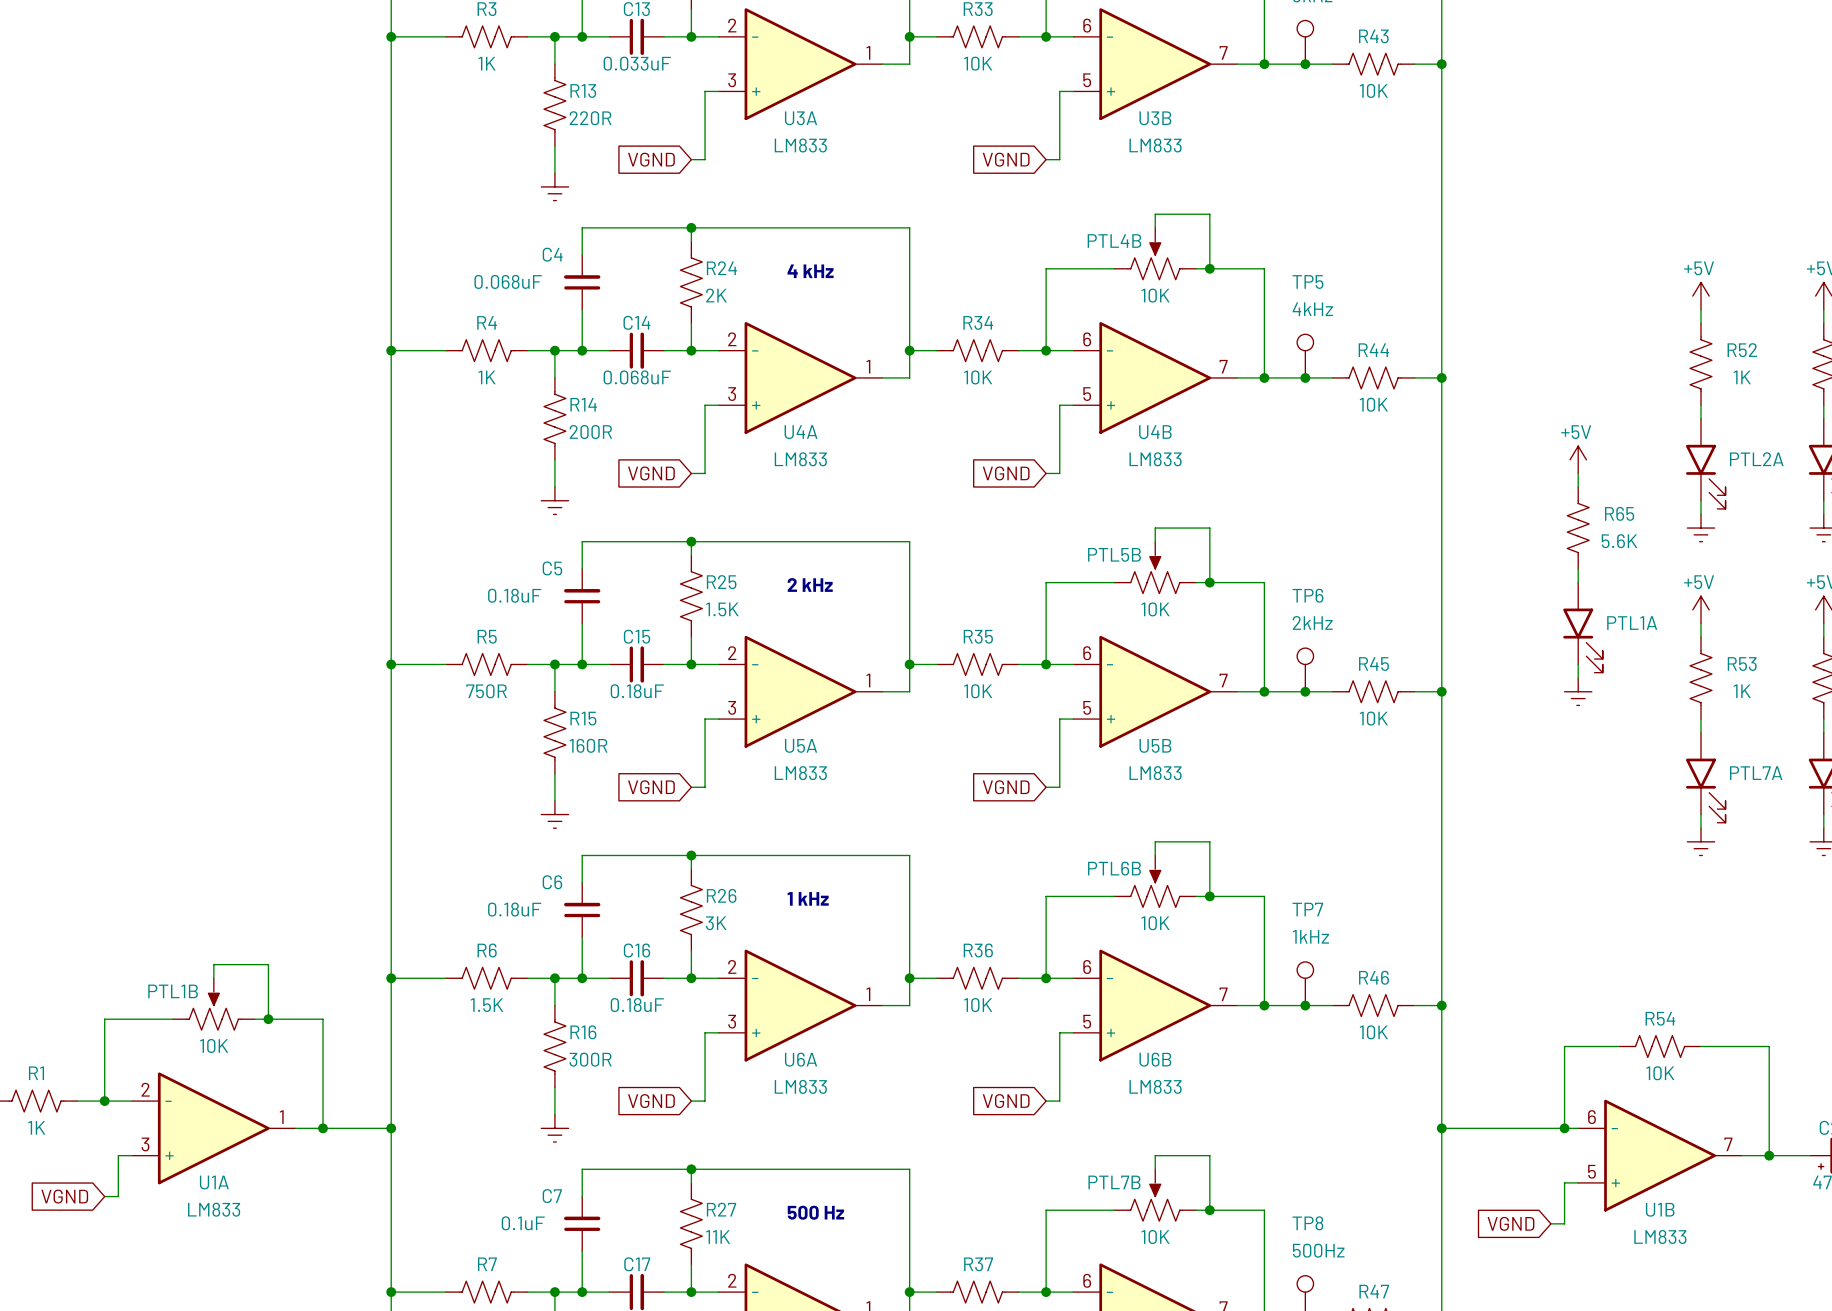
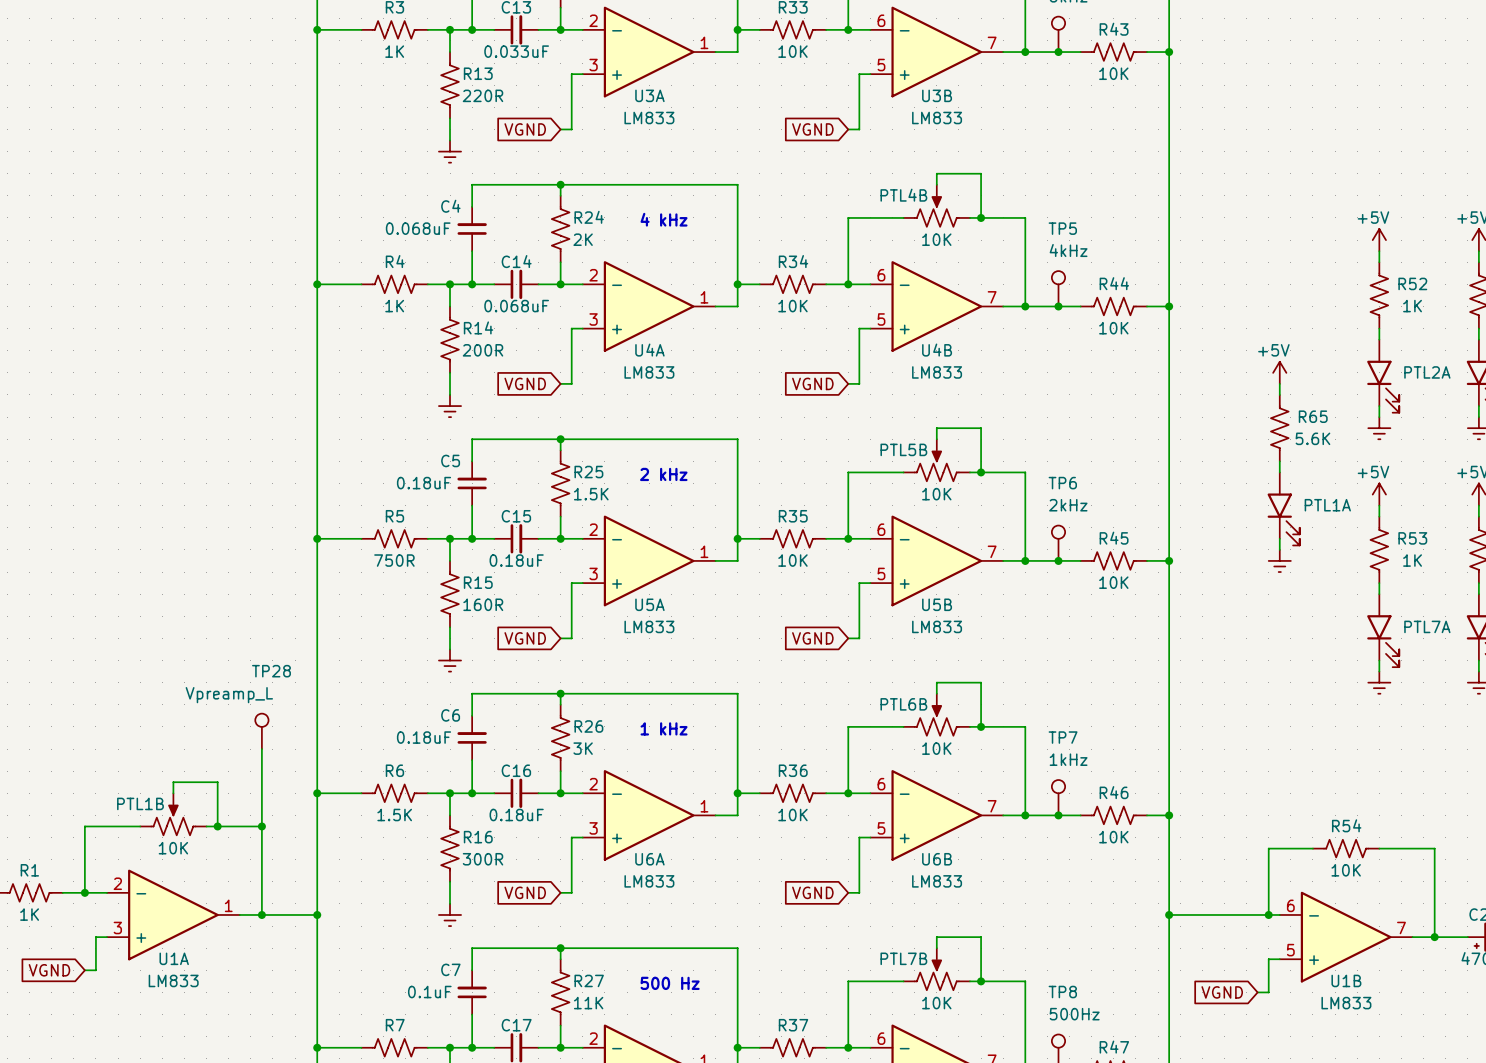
TP28: none -> Vpreamp_L (261, 731)
wire: none -> (261, 749) (261, 826)
junction: none -> (261, 826)

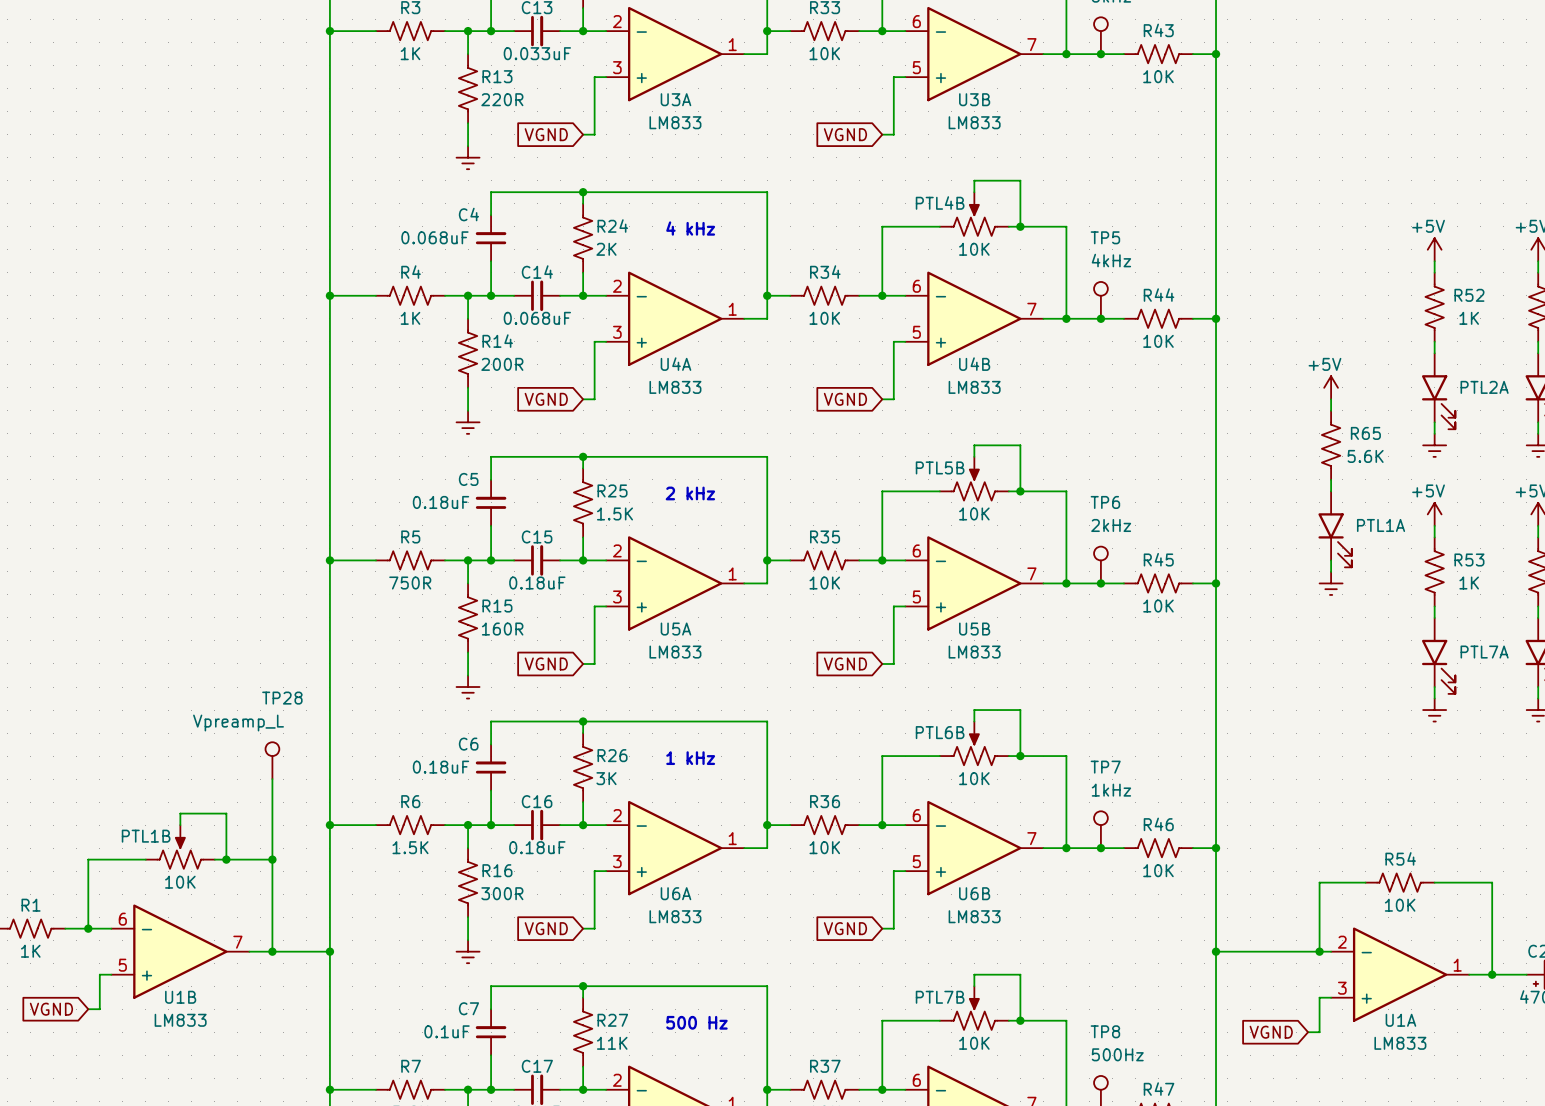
U1A position: (173, 914) -> (1400, 974)
U1B position: (1346, 937) -> (180, 951)

